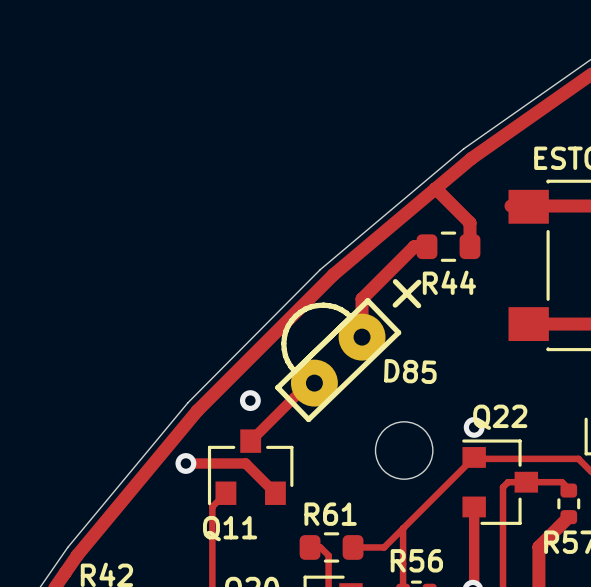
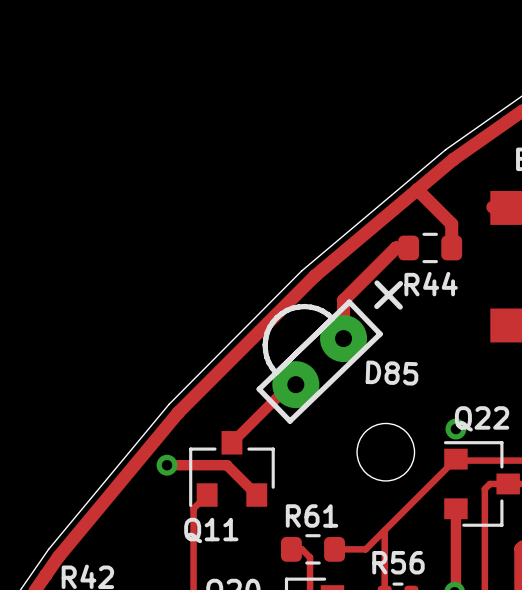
via: (250, 400) -> none

